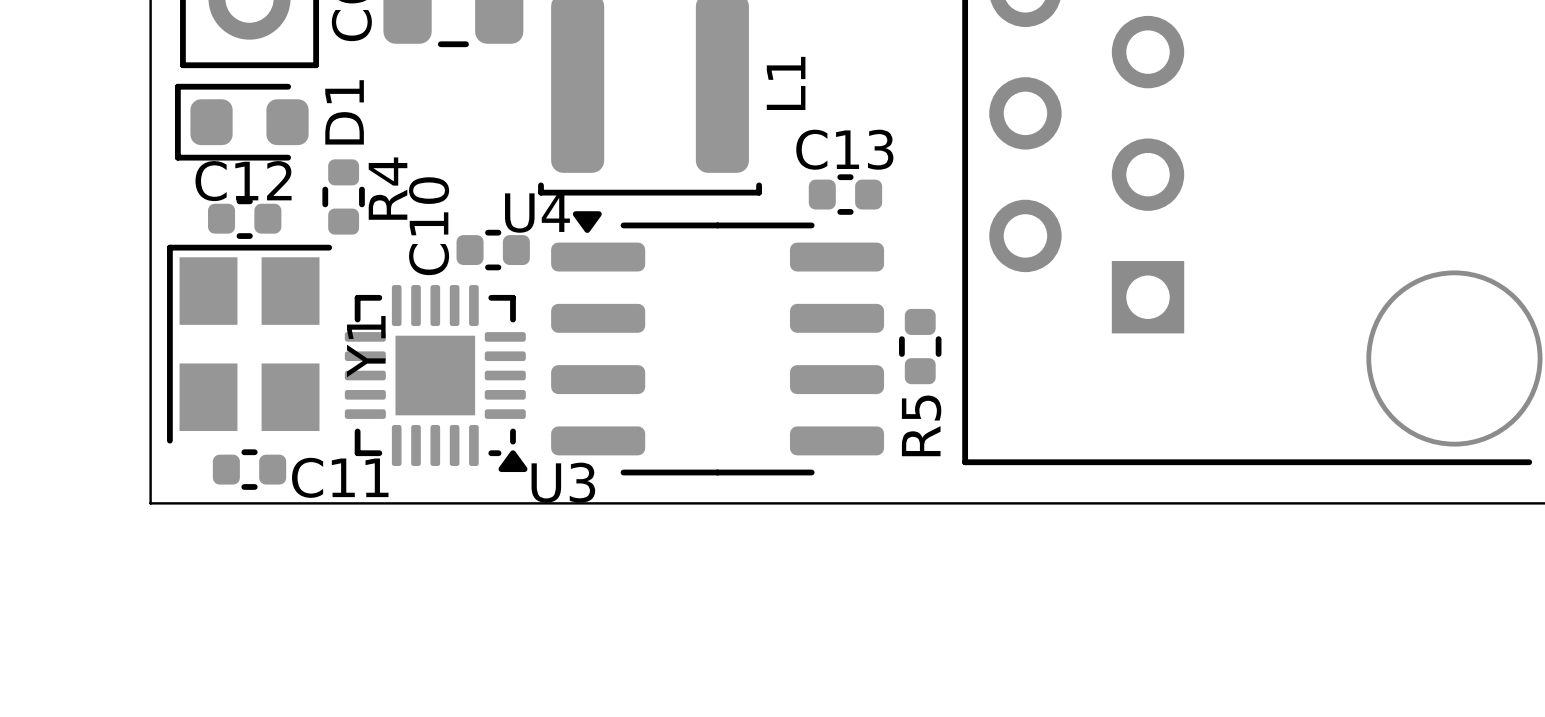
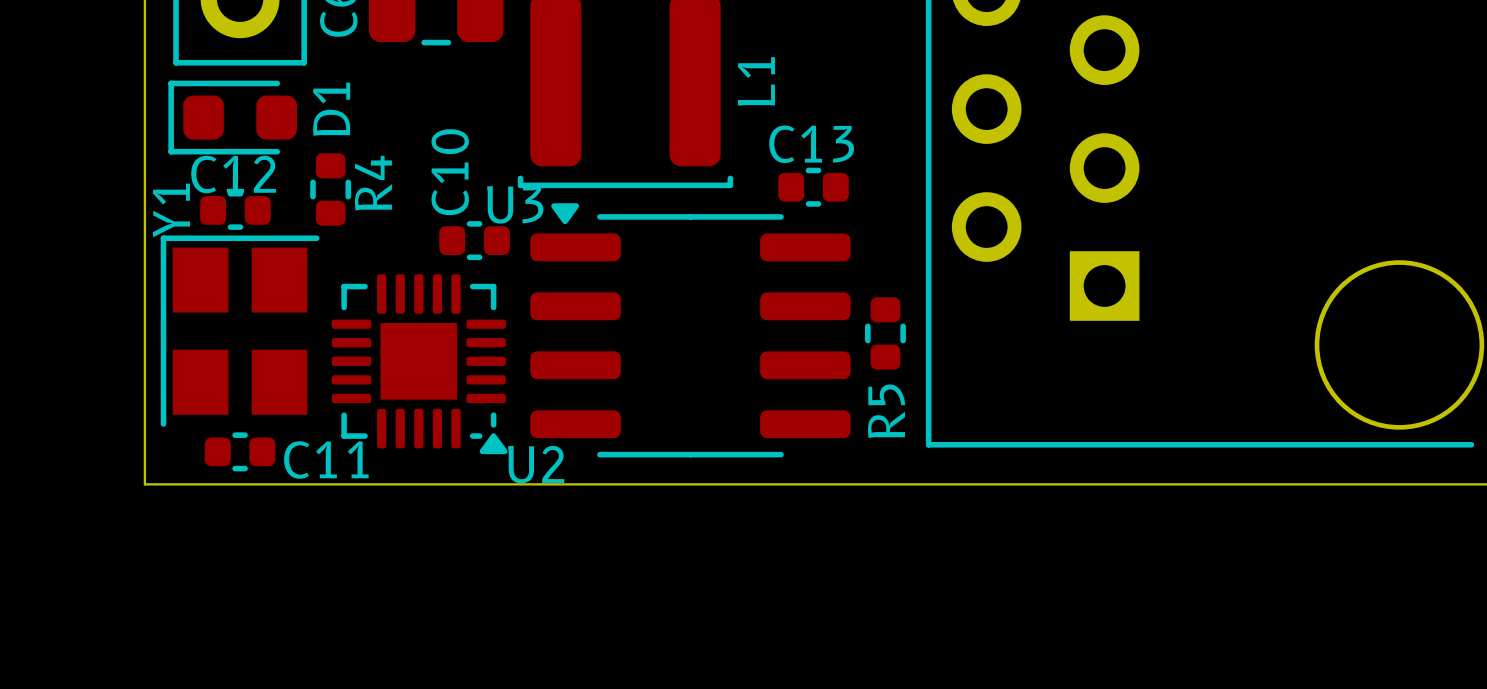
U4 name: U4 (537, 213) -> U3 (515, 204)
C10 name position: C10 (429, 226) -> C10 (450, 172)
Y1 name position: Y1 (366, 346) -> Y1 (171, 210)
U3 name: U3 (563, 482) -> U2 (536, 464)

